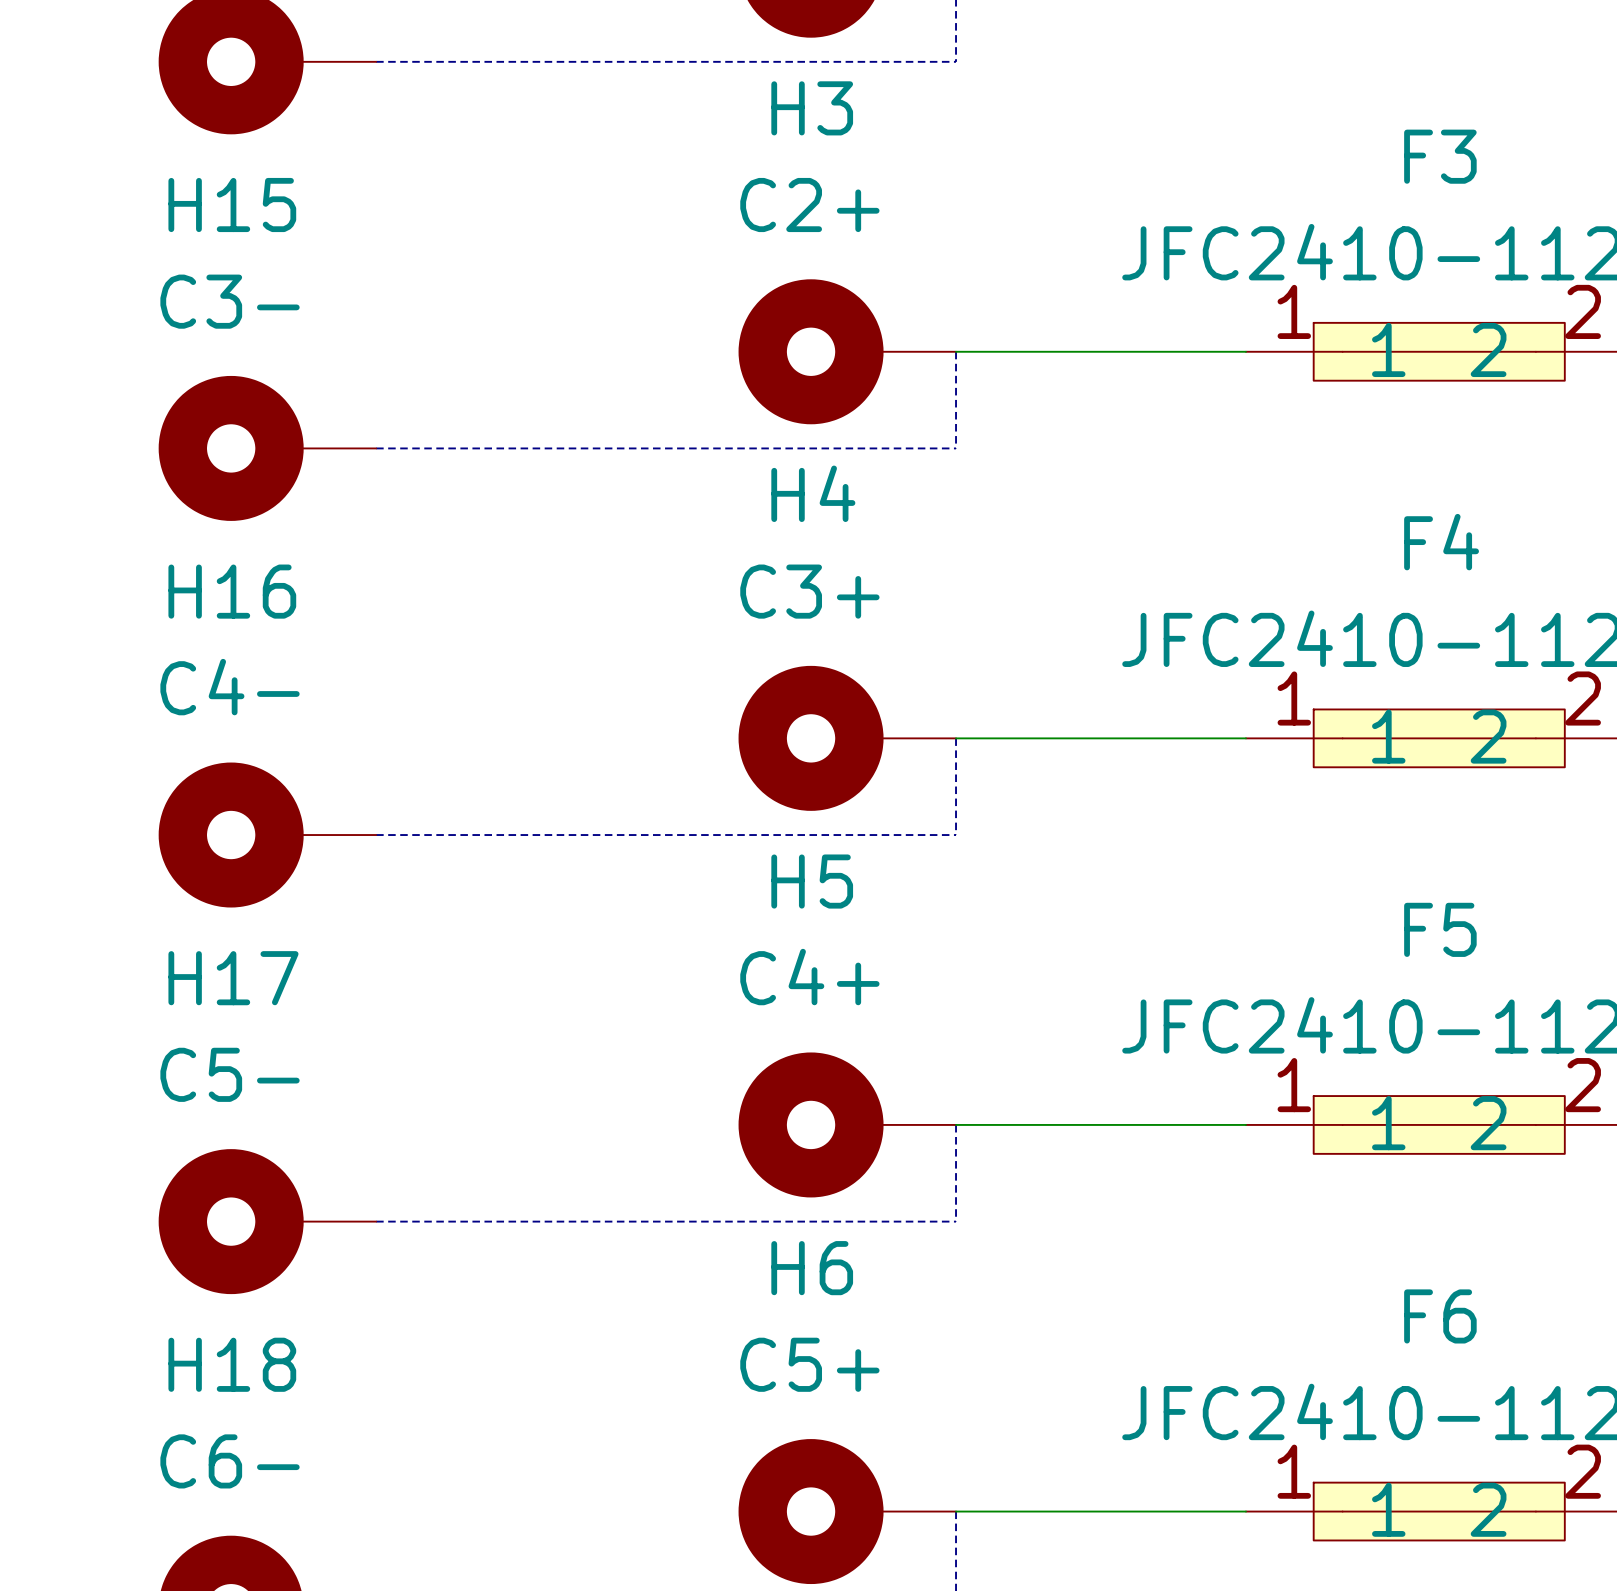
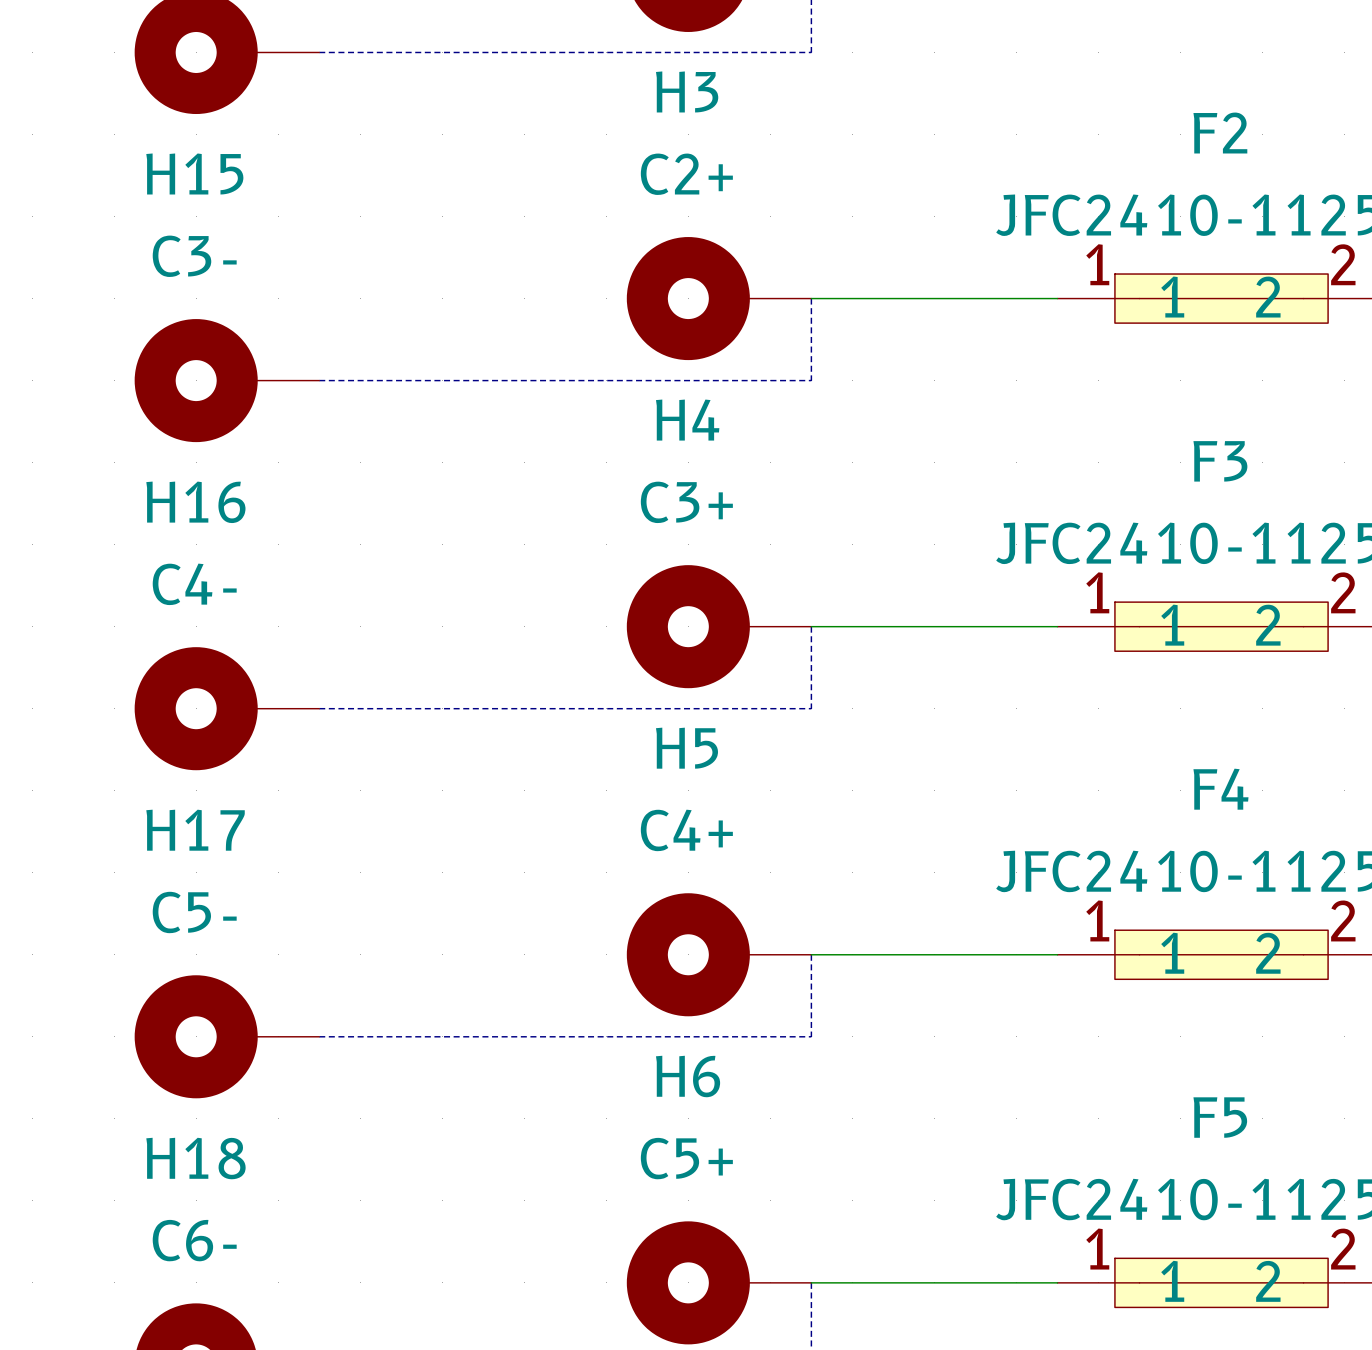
F3 name: F3 (1440, 156) -> F2 (1220, 133)
F4 name: F4 (1441, 542) -> F3 (1220, 461)
F5 name: F5 (1440, 929) -> F4 (1220, 789)
F6 name: F6 (1440, 1316) -> F5 (1220, 1117)

